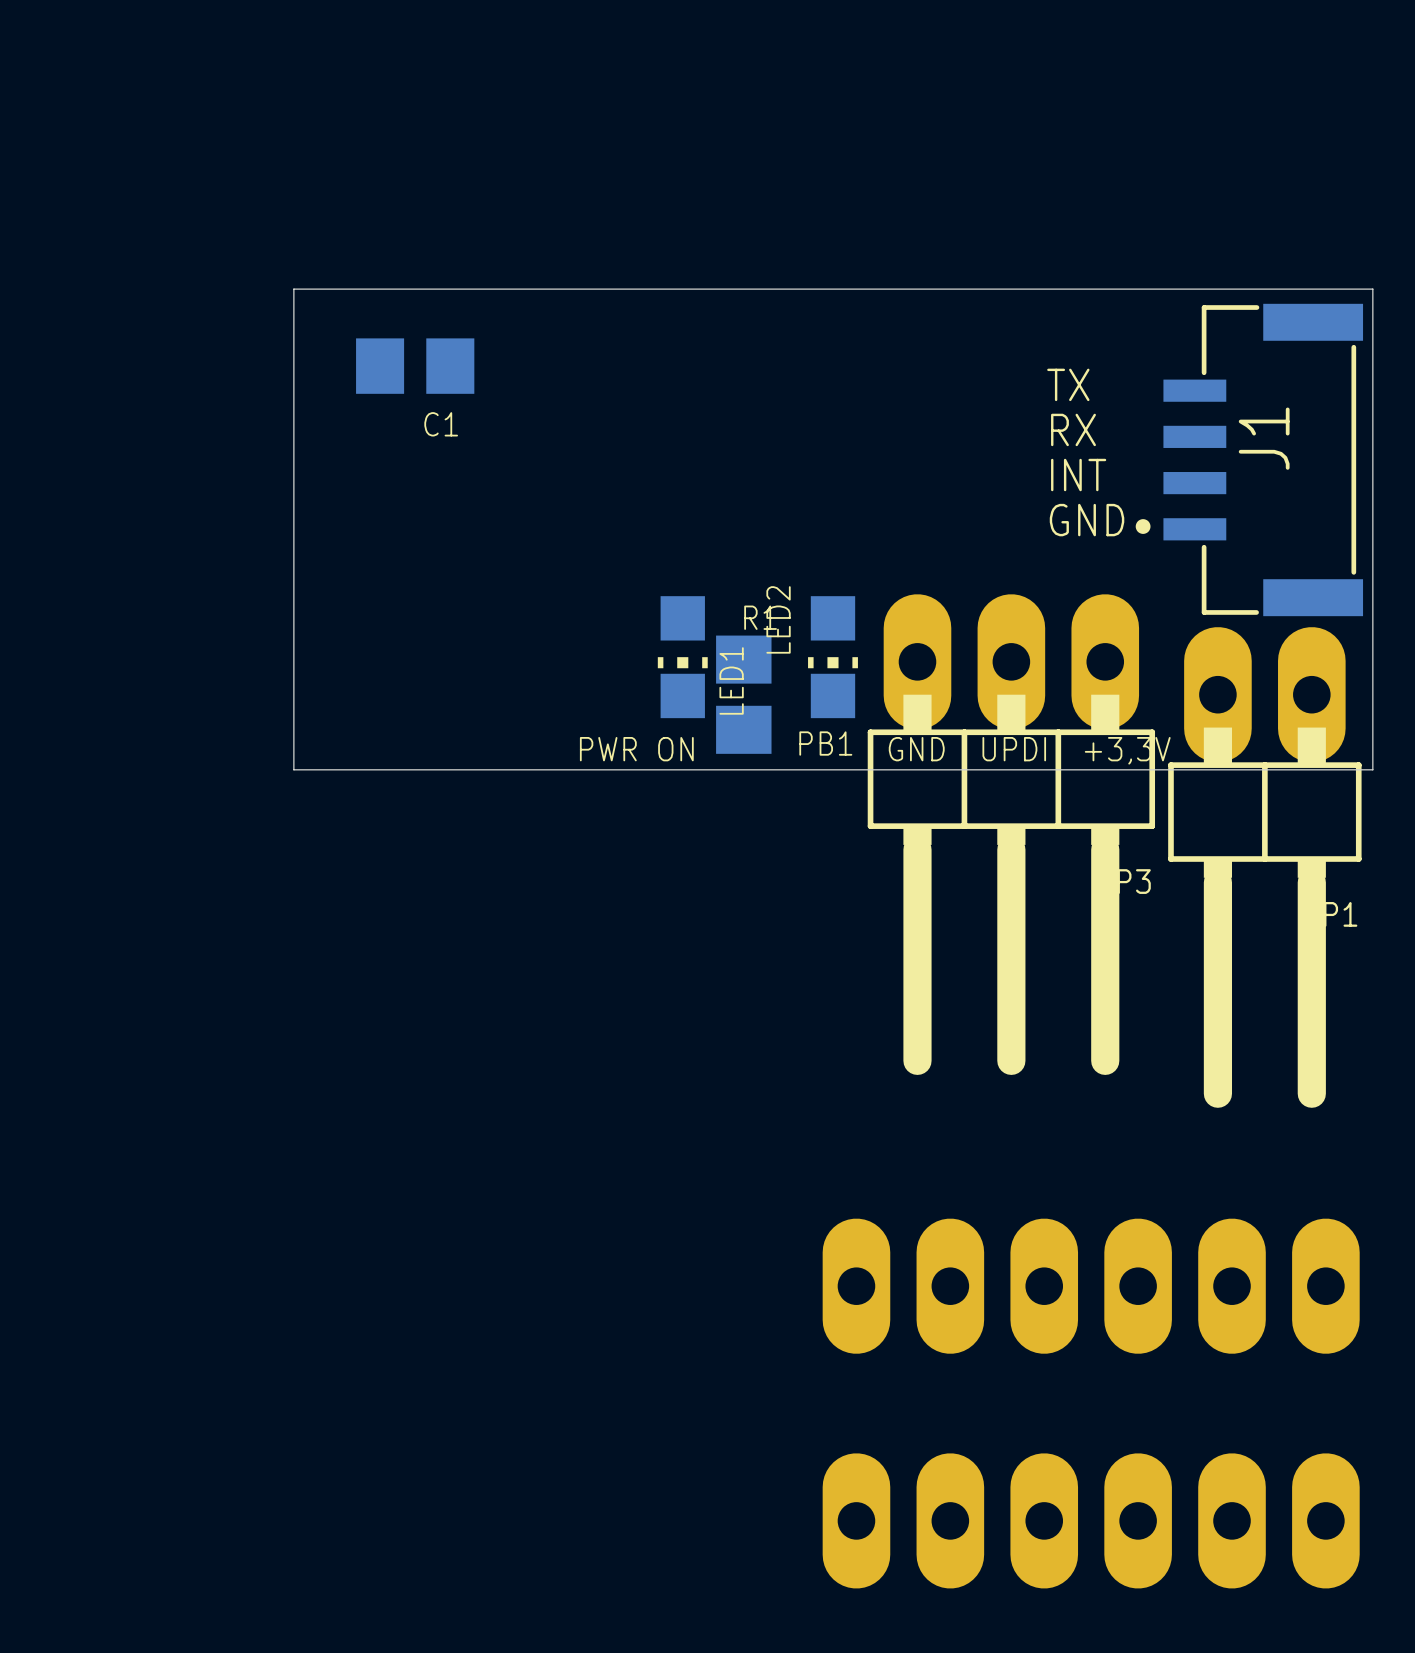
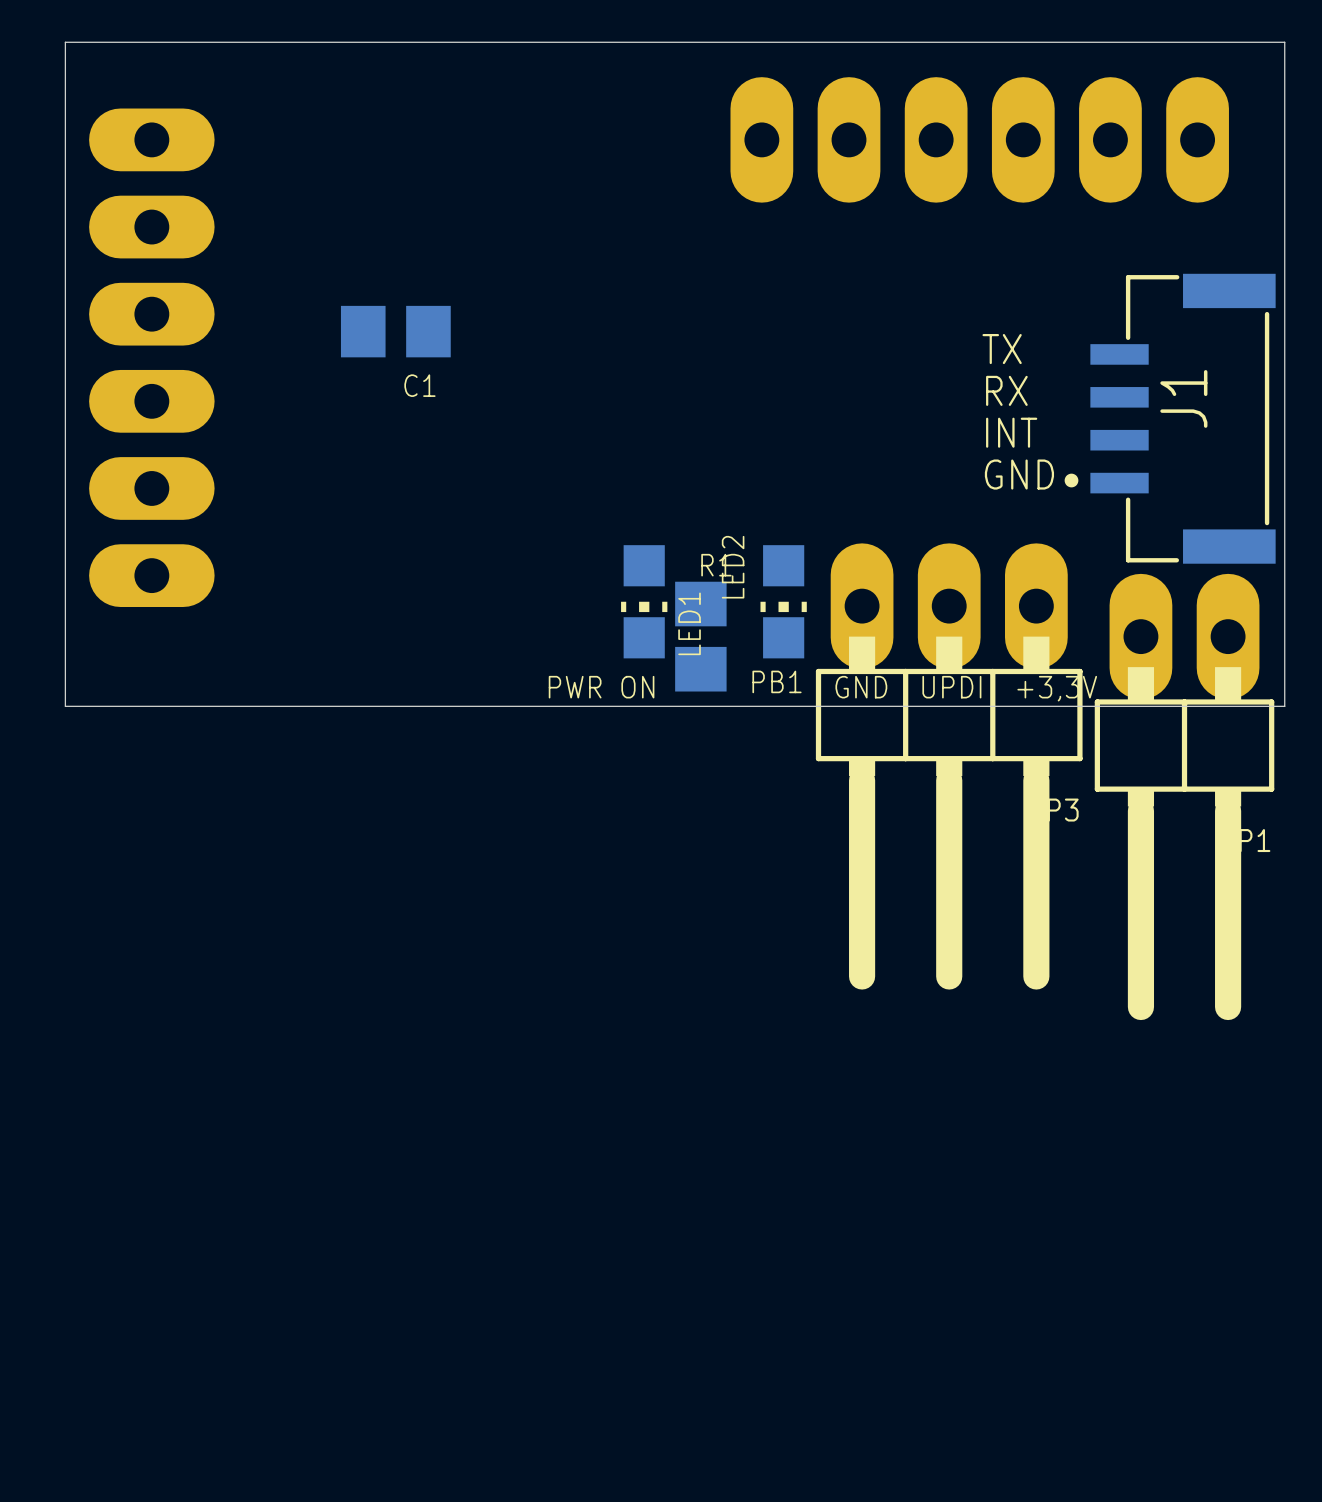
part: none -> (979, 139)
board edge: (1372, 289) (293, 289) (293, 769) -> (1284, 260) (1284, 42) (65, 42) (65, 706) (283, 706)
part: none -> (151, 357)
part: (1091, 1286) -> none
part: (1091, 1520) -> none

